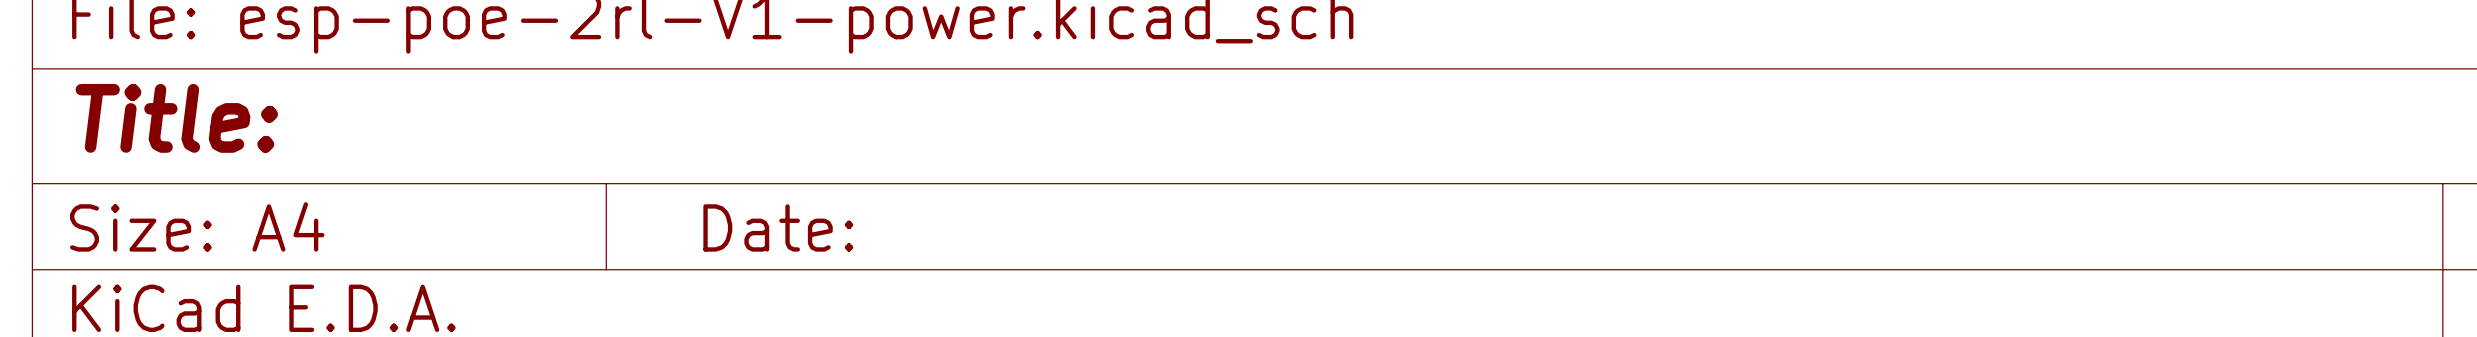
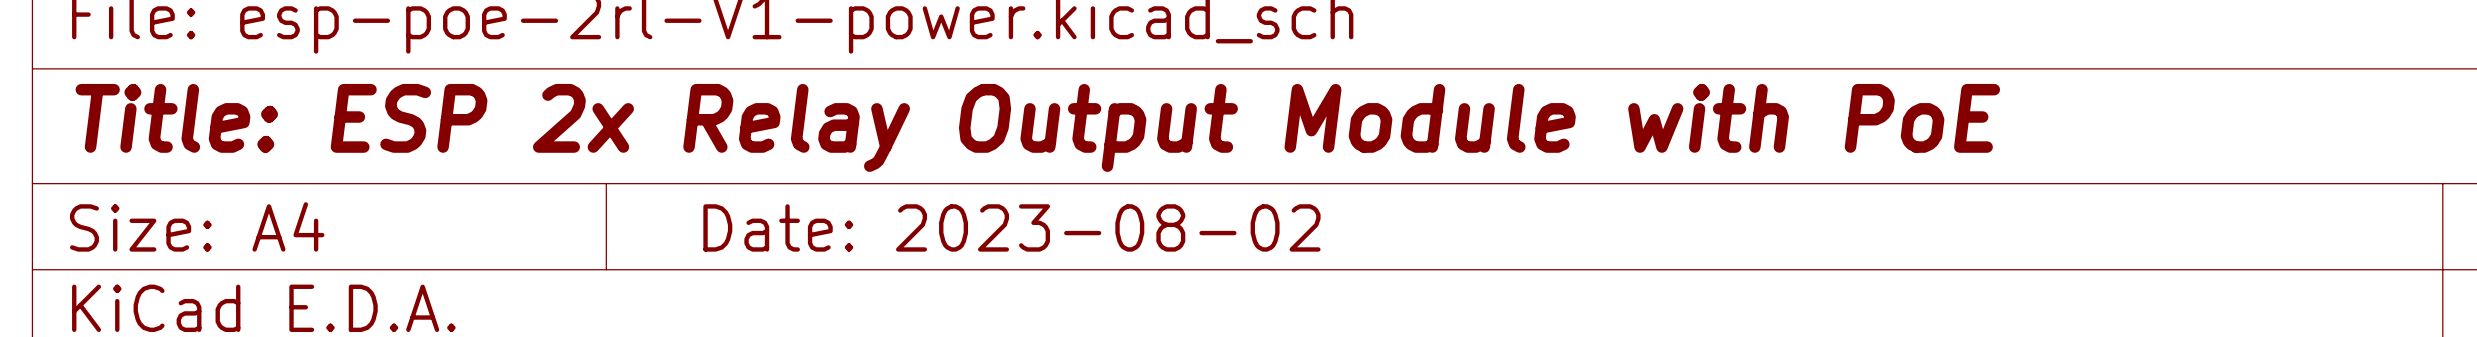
title block: Title: (176, 118) -> Title: ESP 2x Relay Output Module with PoE (1037, 127)
title block: Date: (778, 227) -> Date: 2023-08-02 (1011, 227)

